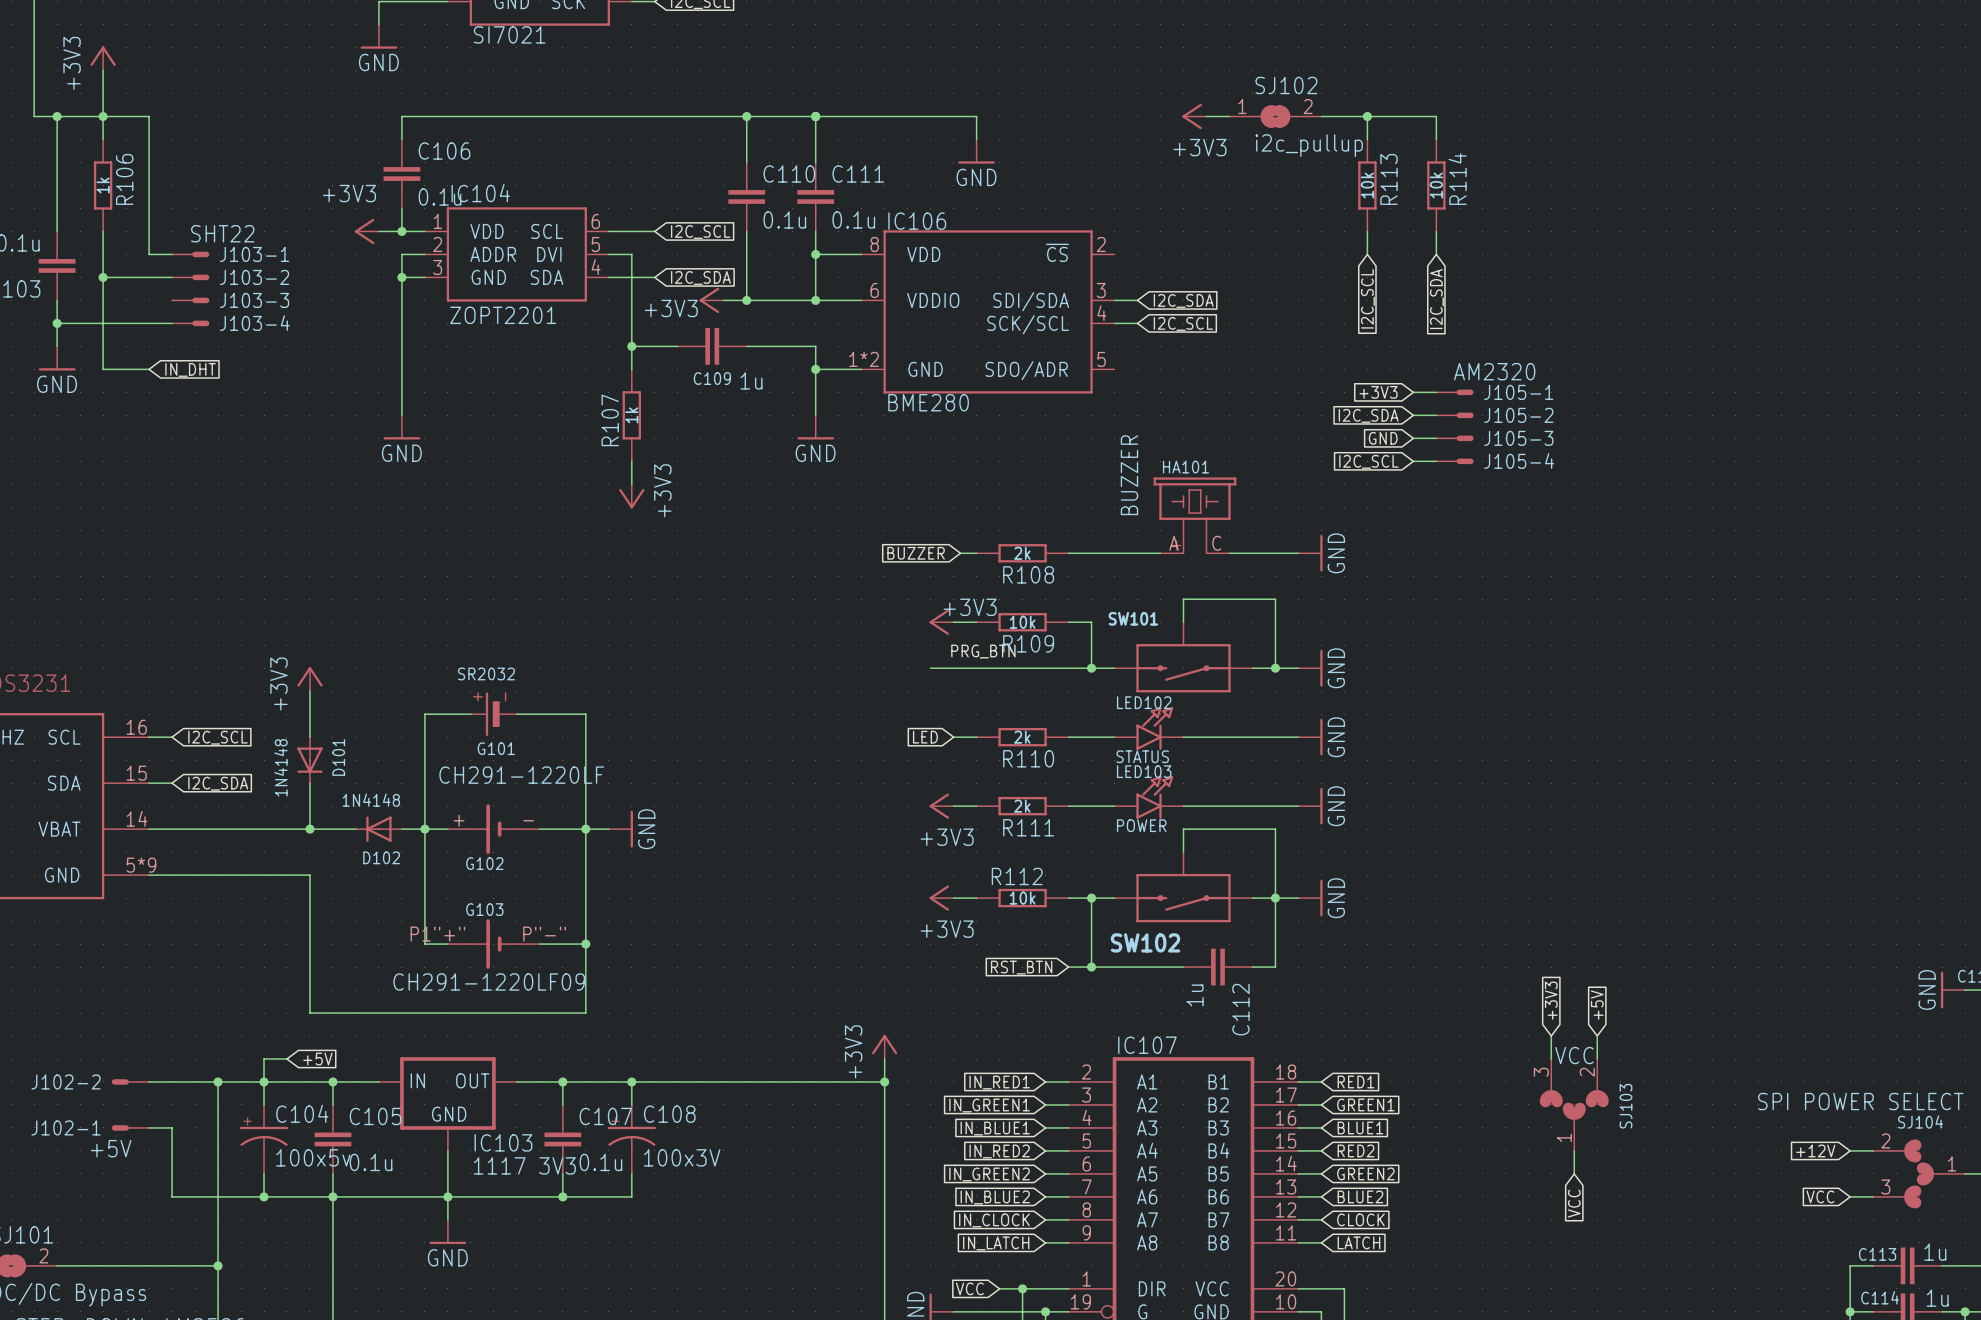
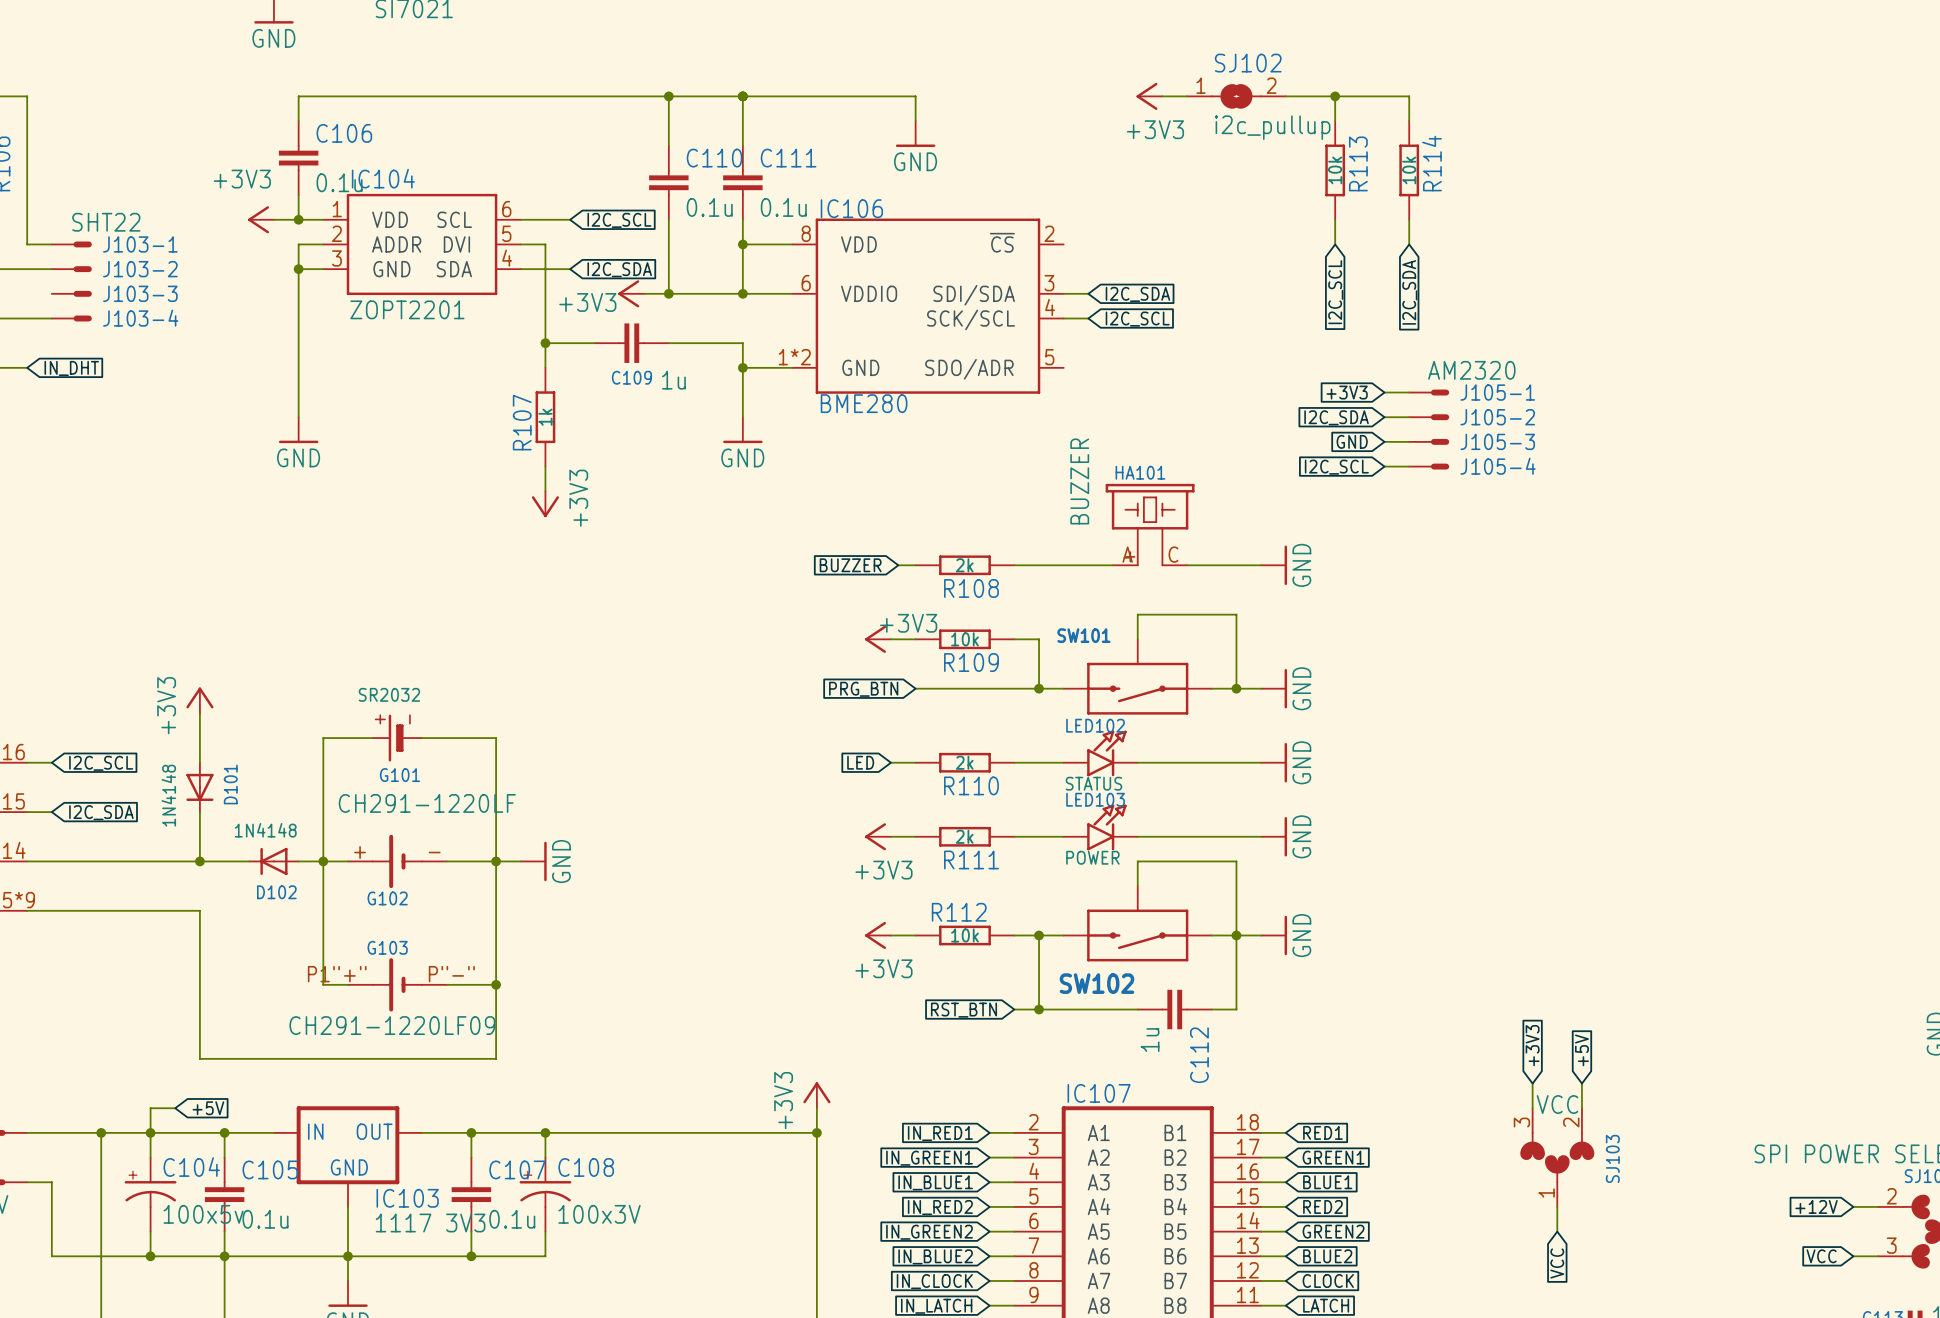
label: PRG_BTN (983, 651) -> none
global label: none -> PRG_BTN (863, 689)
wire: (930, 668) (976, 668) -> none

